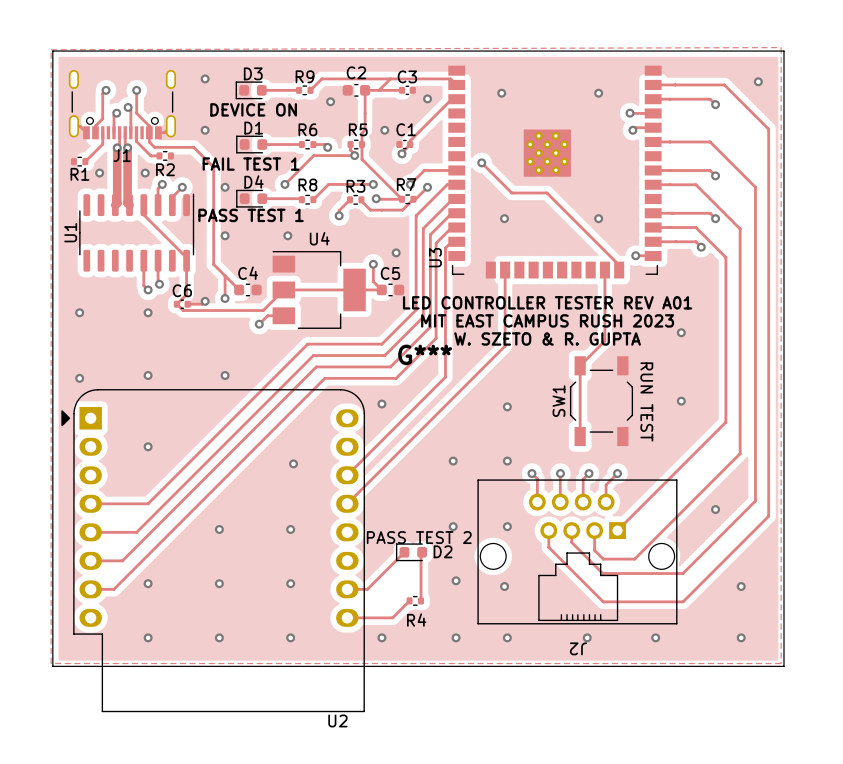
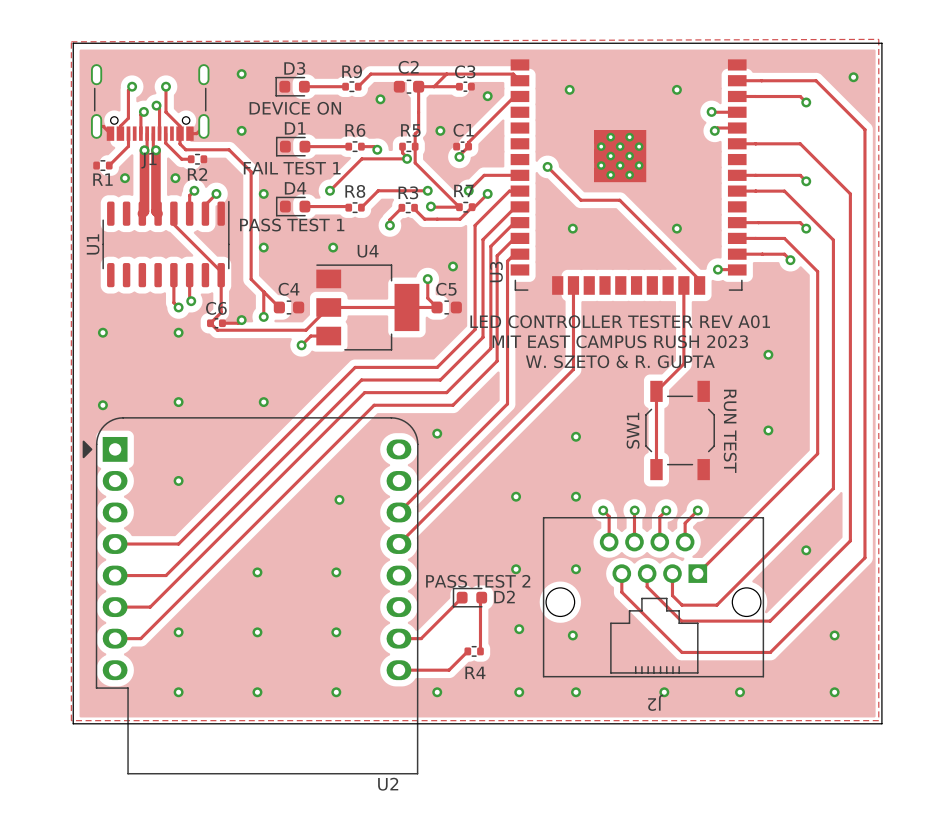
G***: (425, 354) -> none

